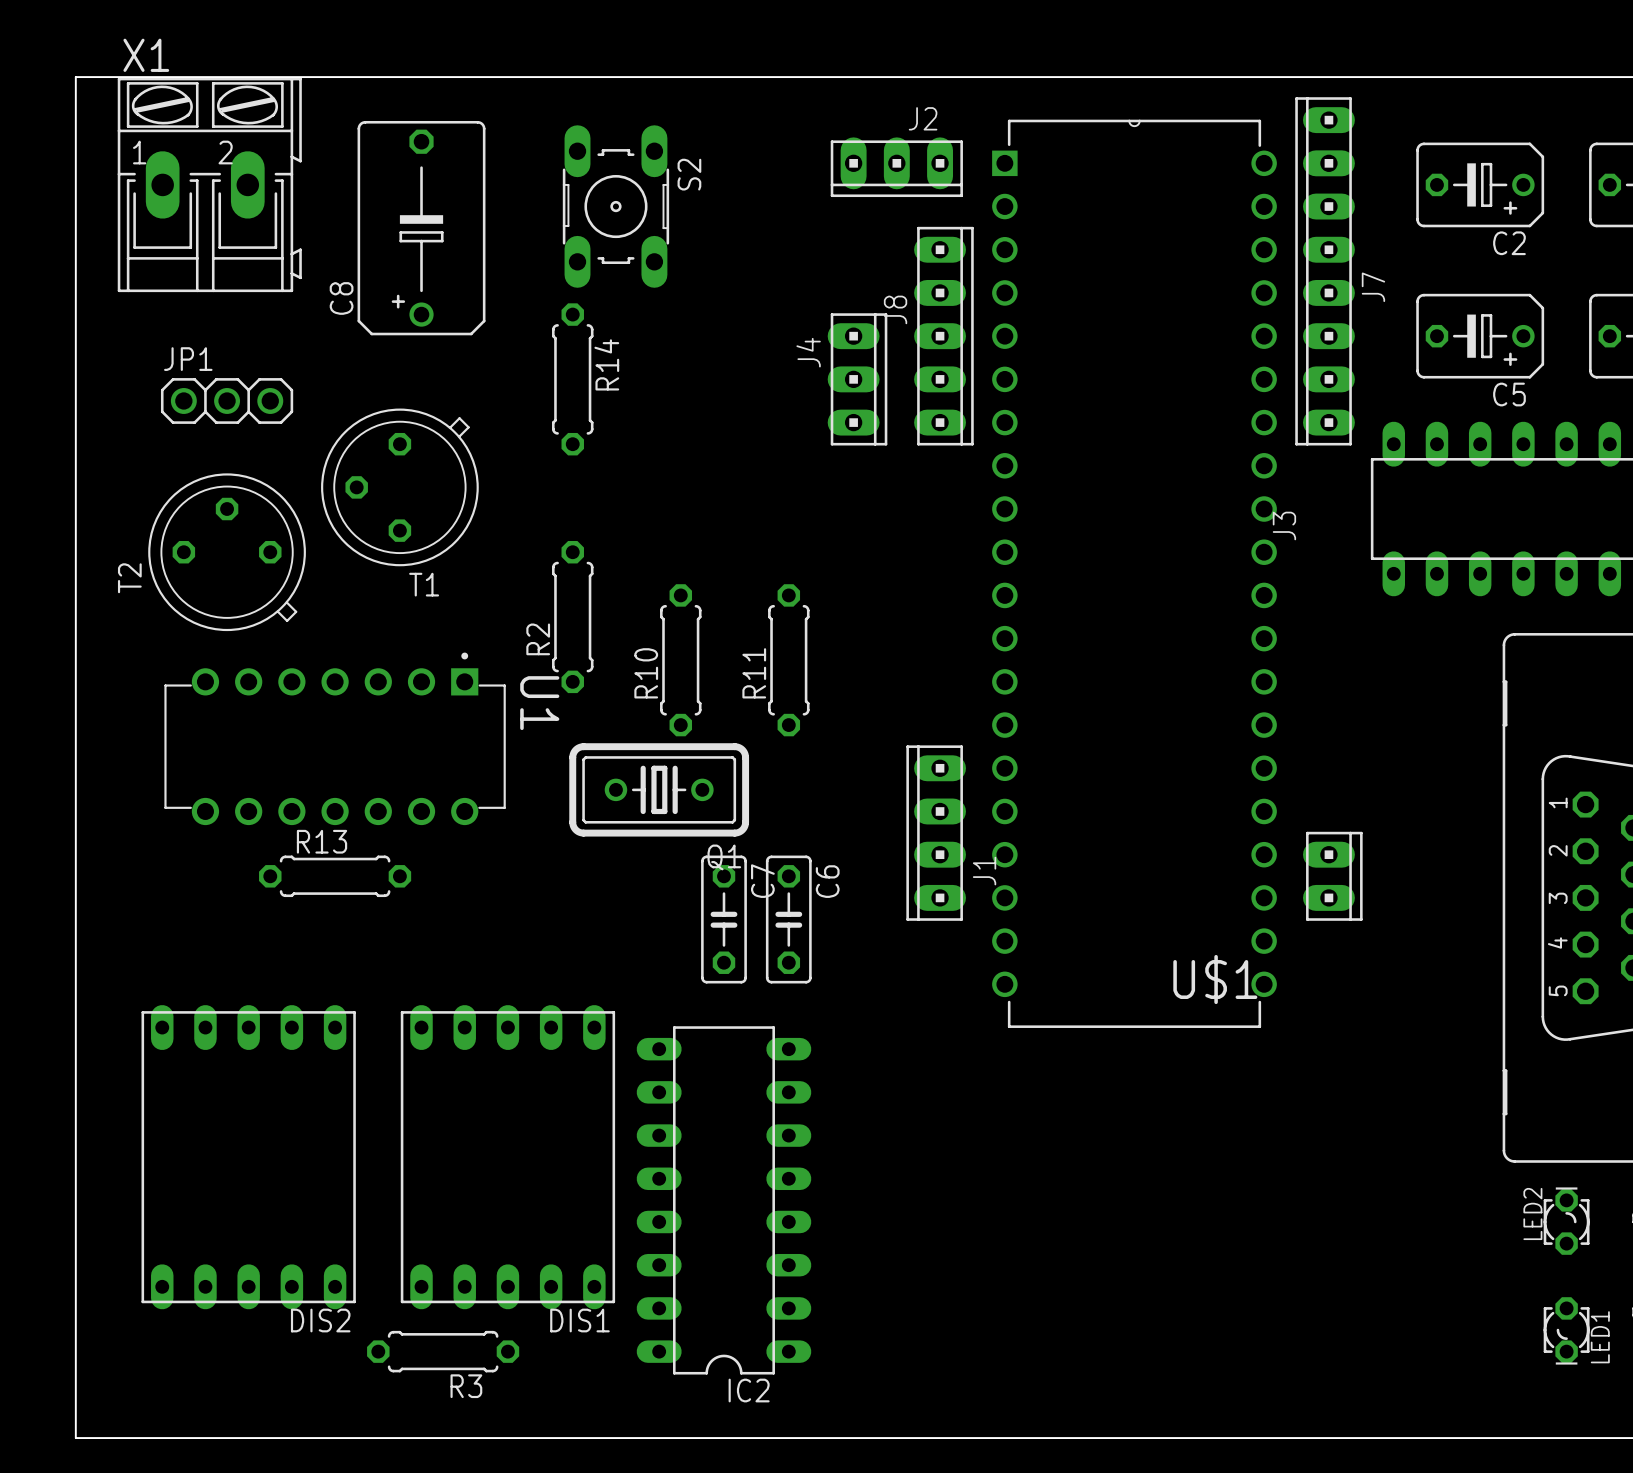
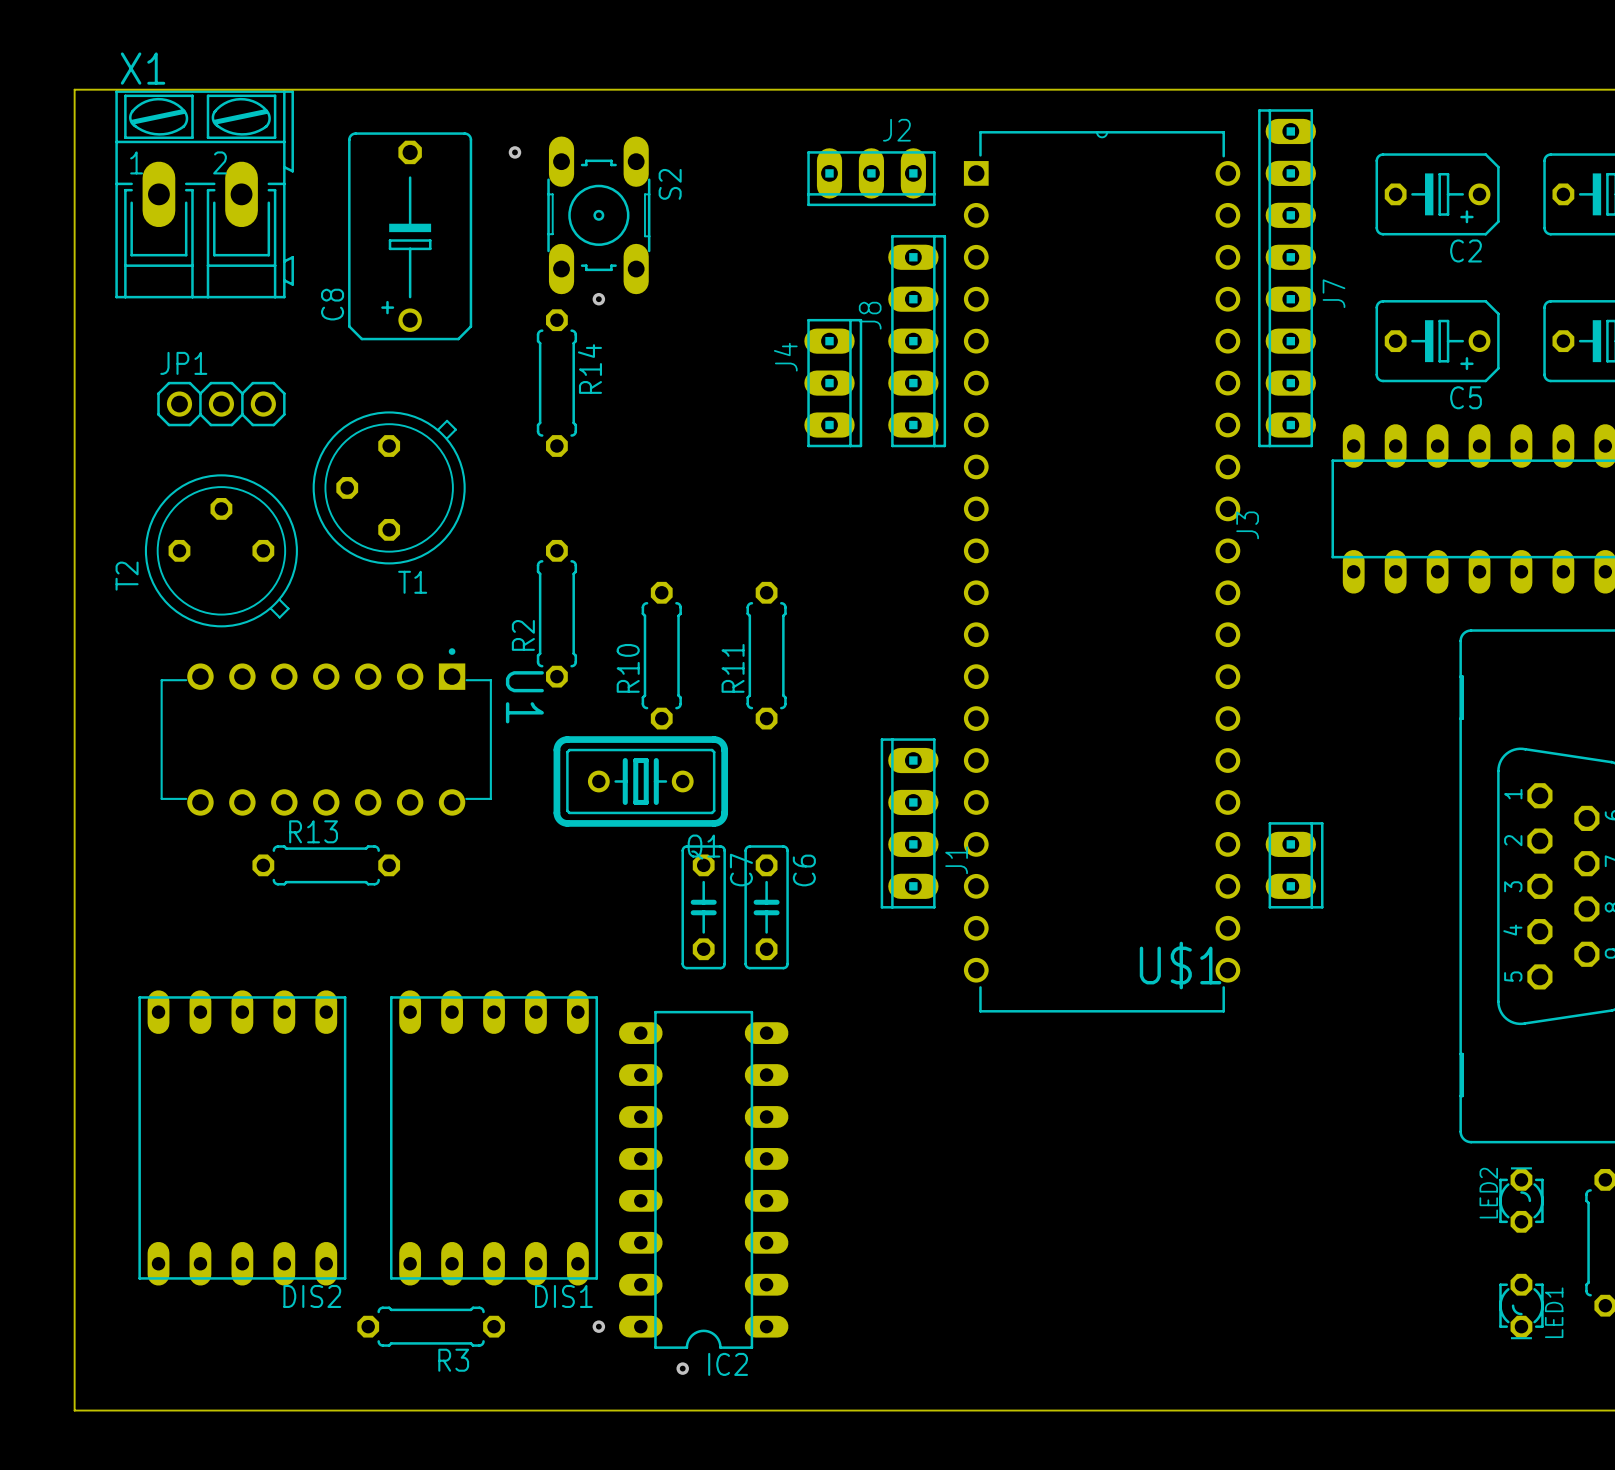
via: none -> (514, 152)
via: none -> (598, 299)
via: none -> (598, 1326)
via: none -> (682, 1368)

